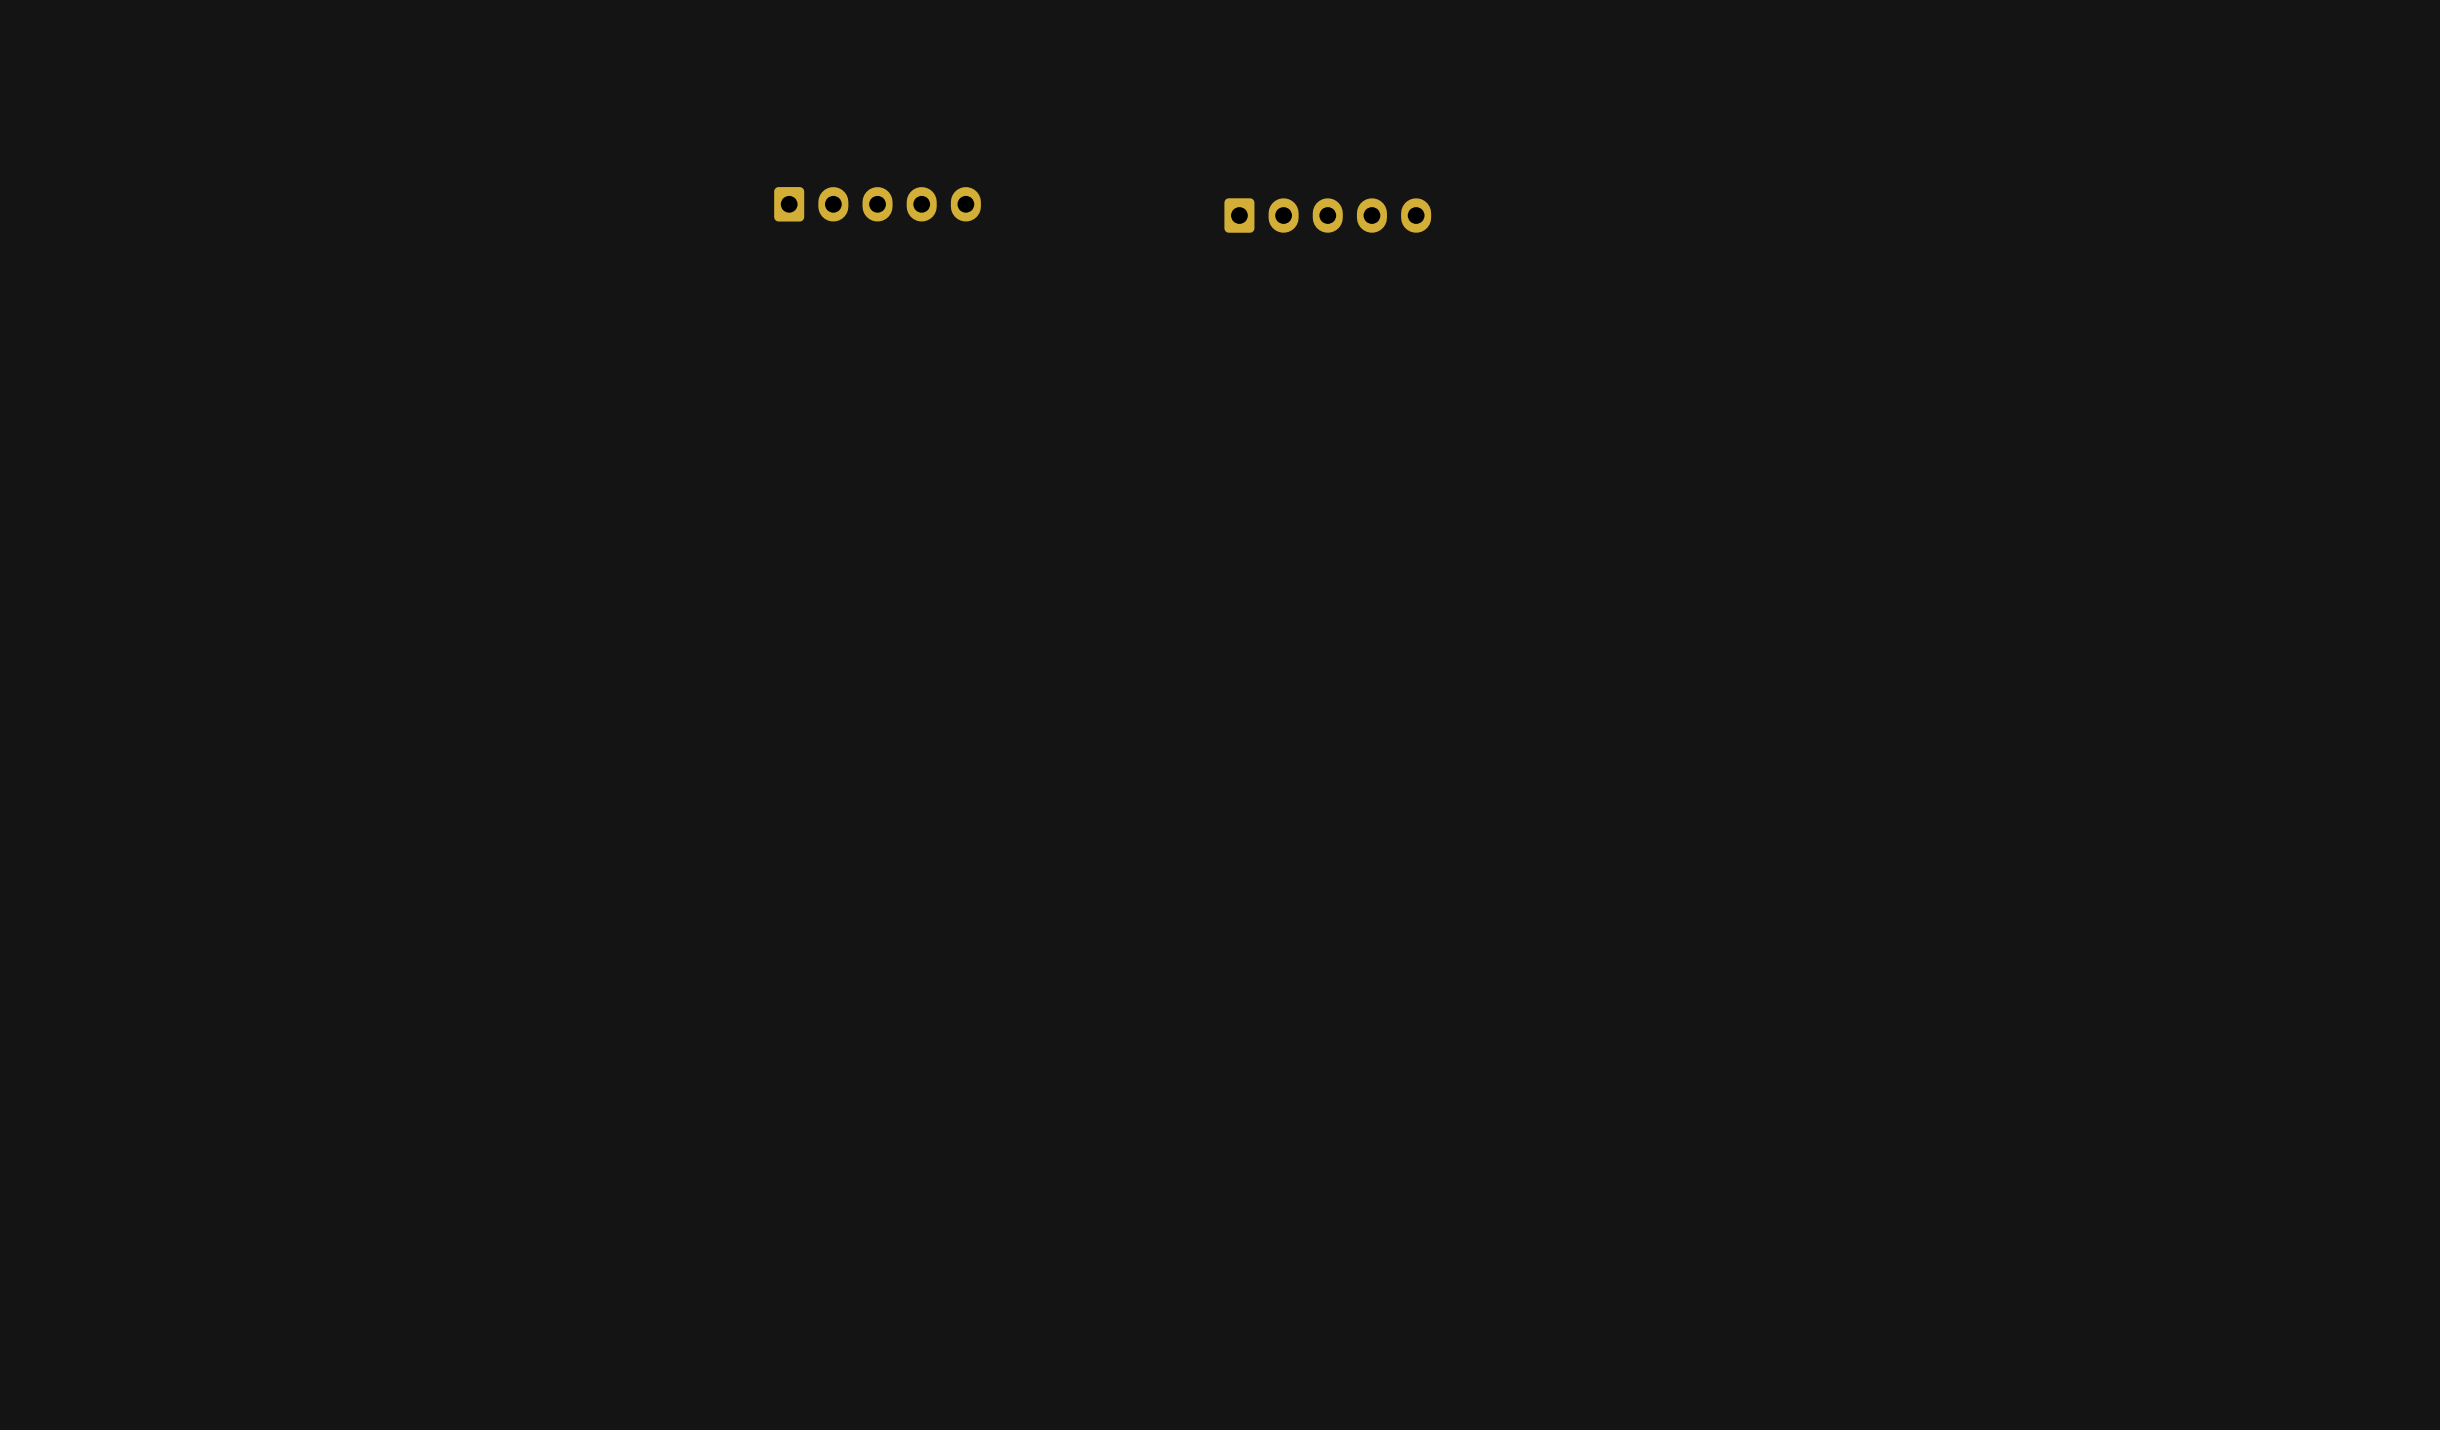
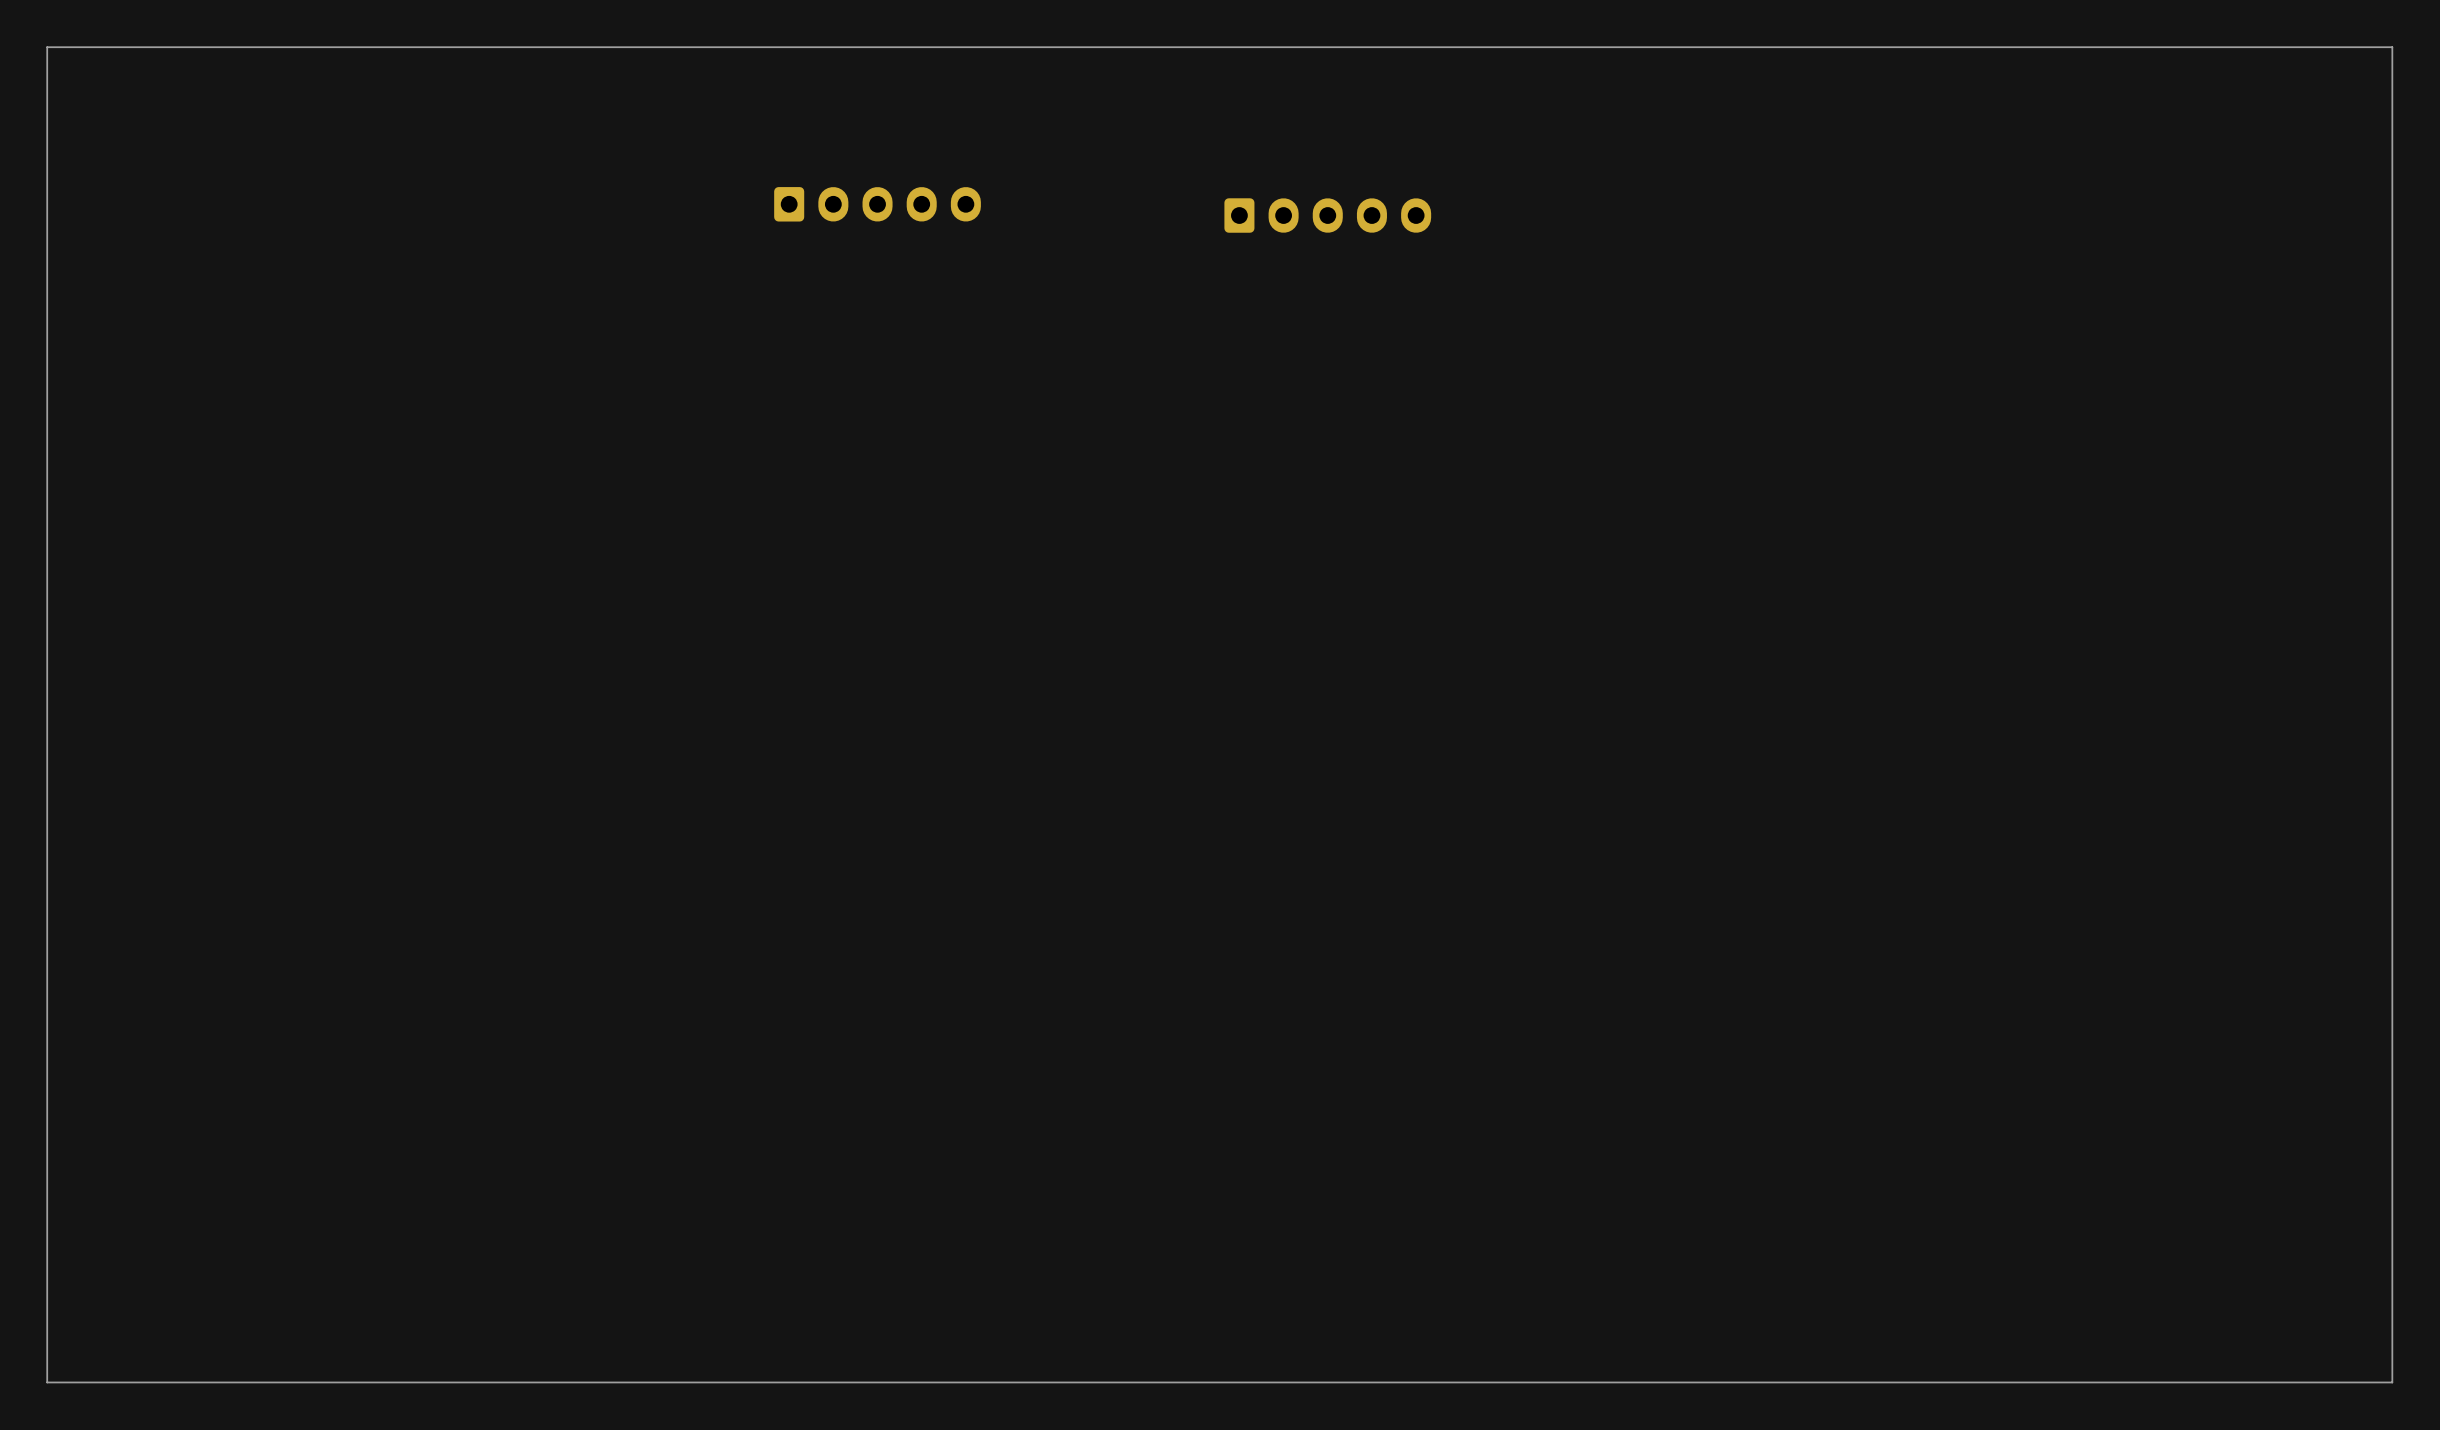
board edge: none -> (2392, 47) (2392, 1382) (47, 1382) (47, 47) (2392, 47)

